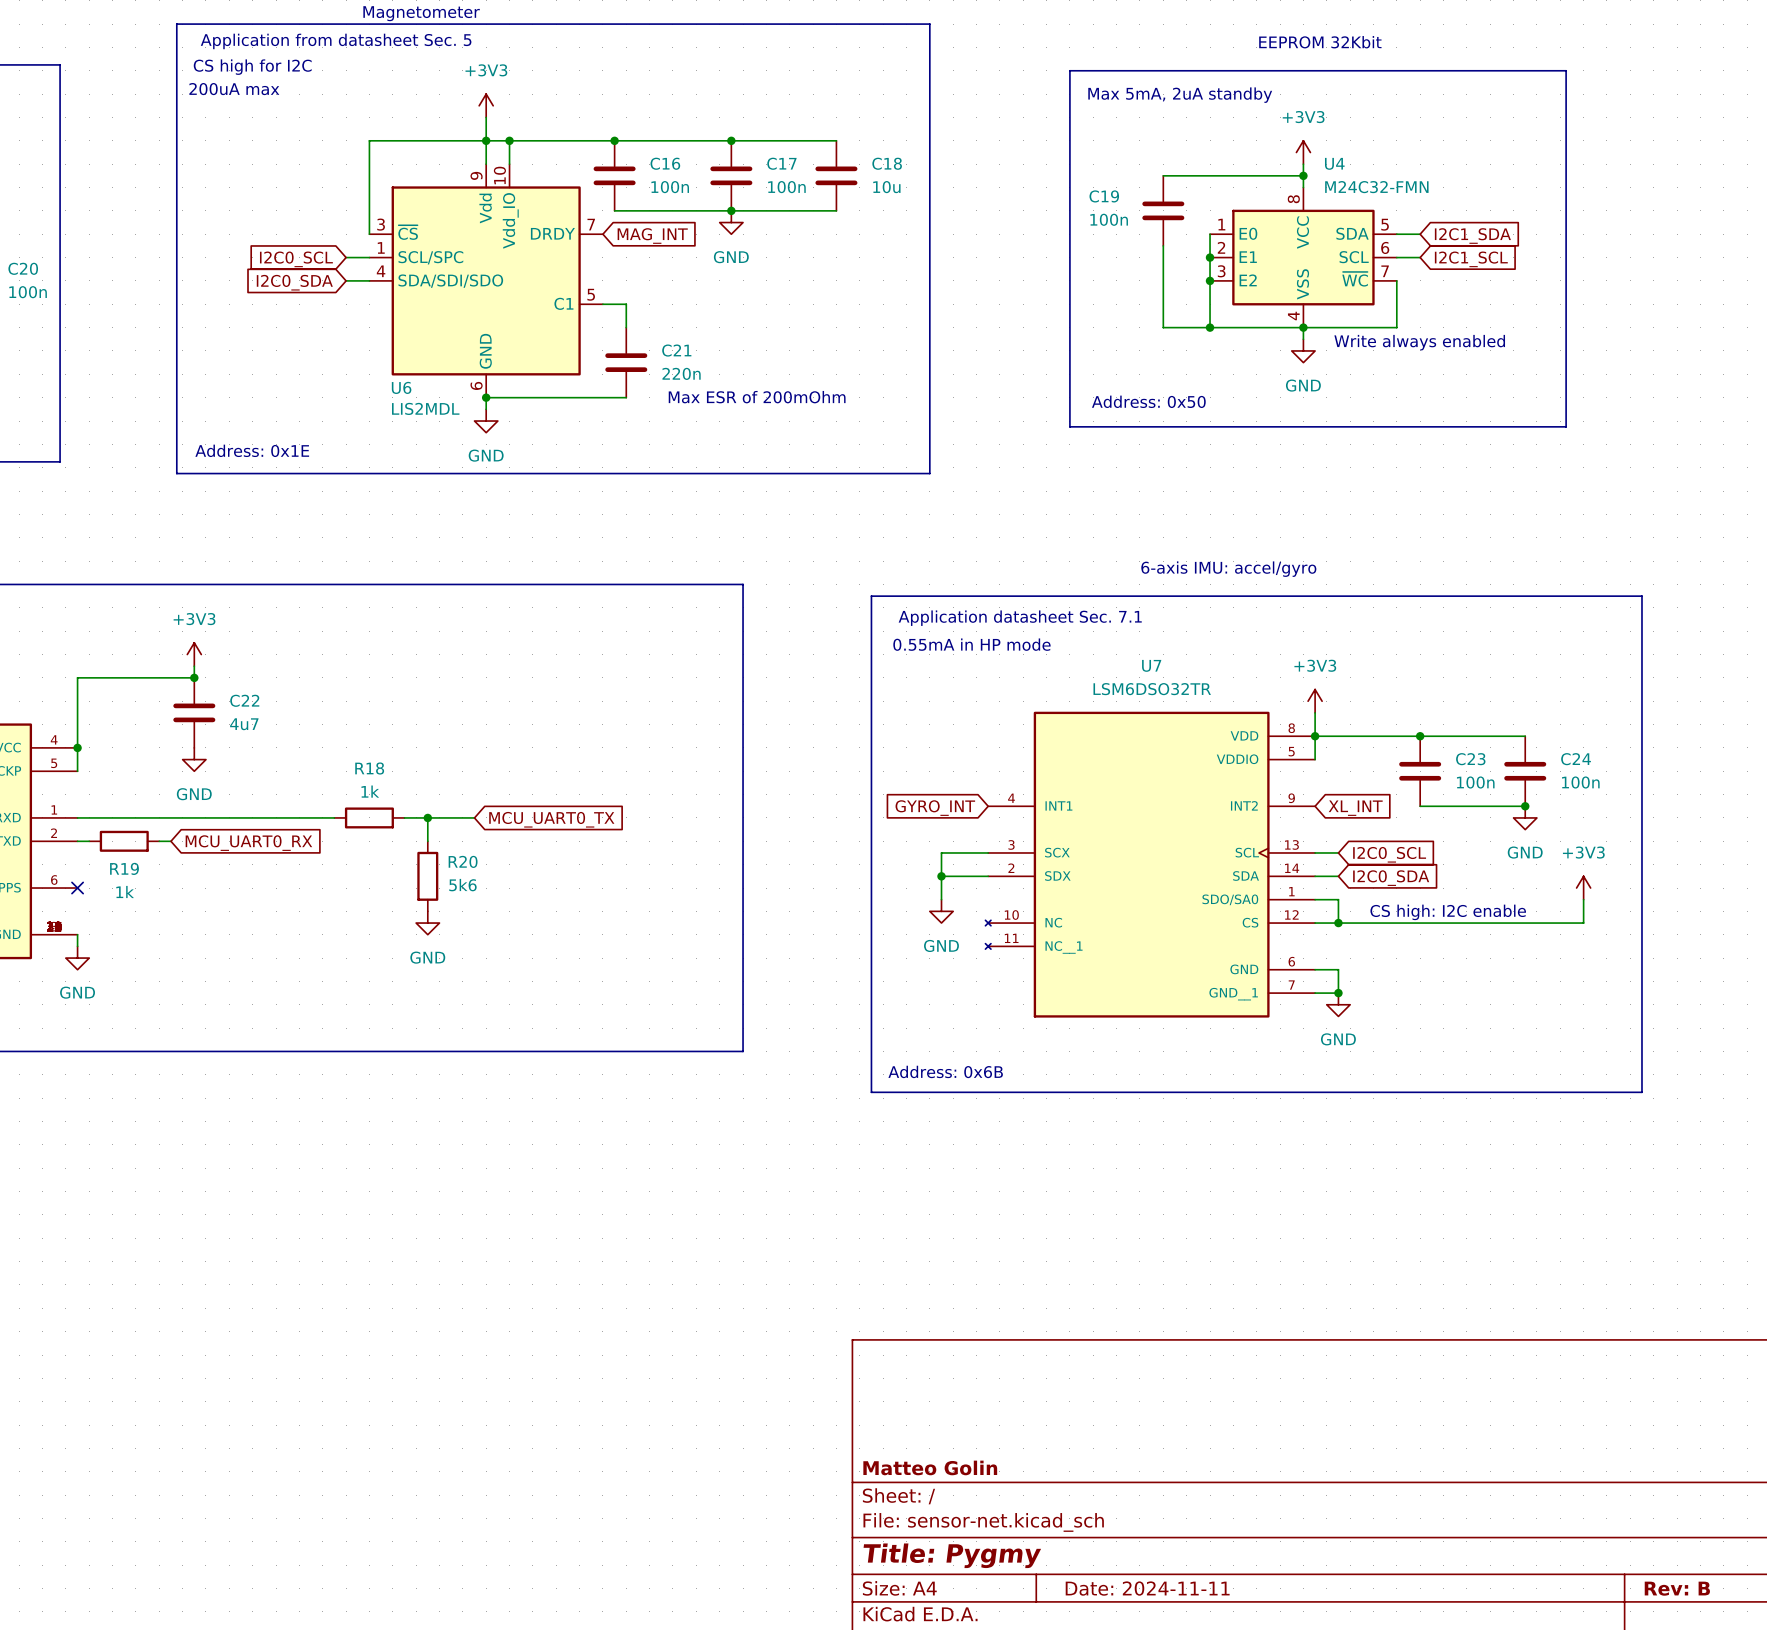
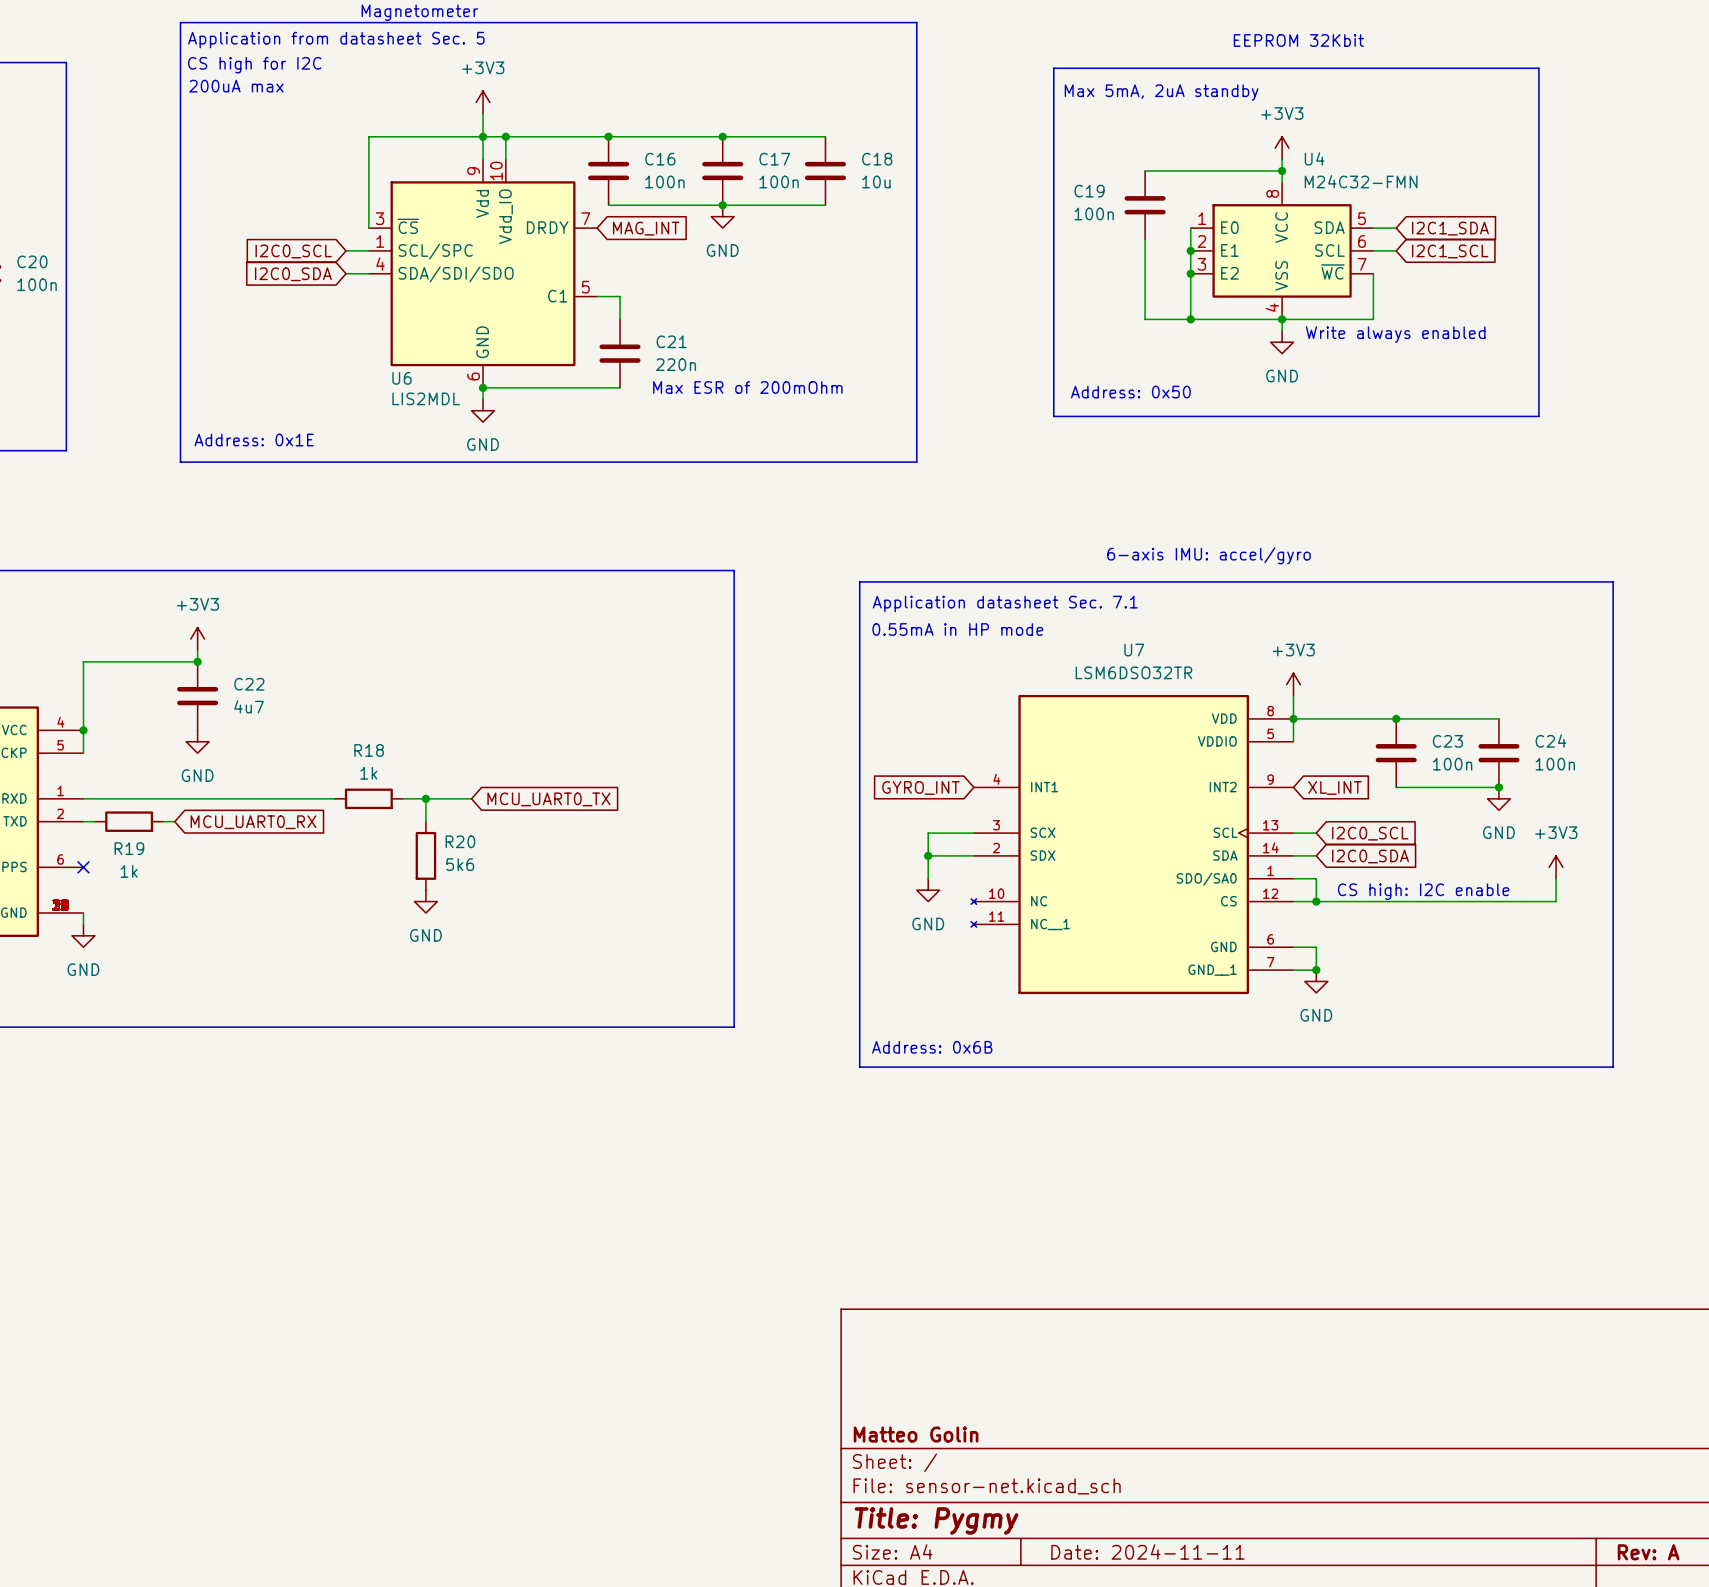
title block: Rev: B (1677, 1588) -> Rev: A (1648, 1552)

